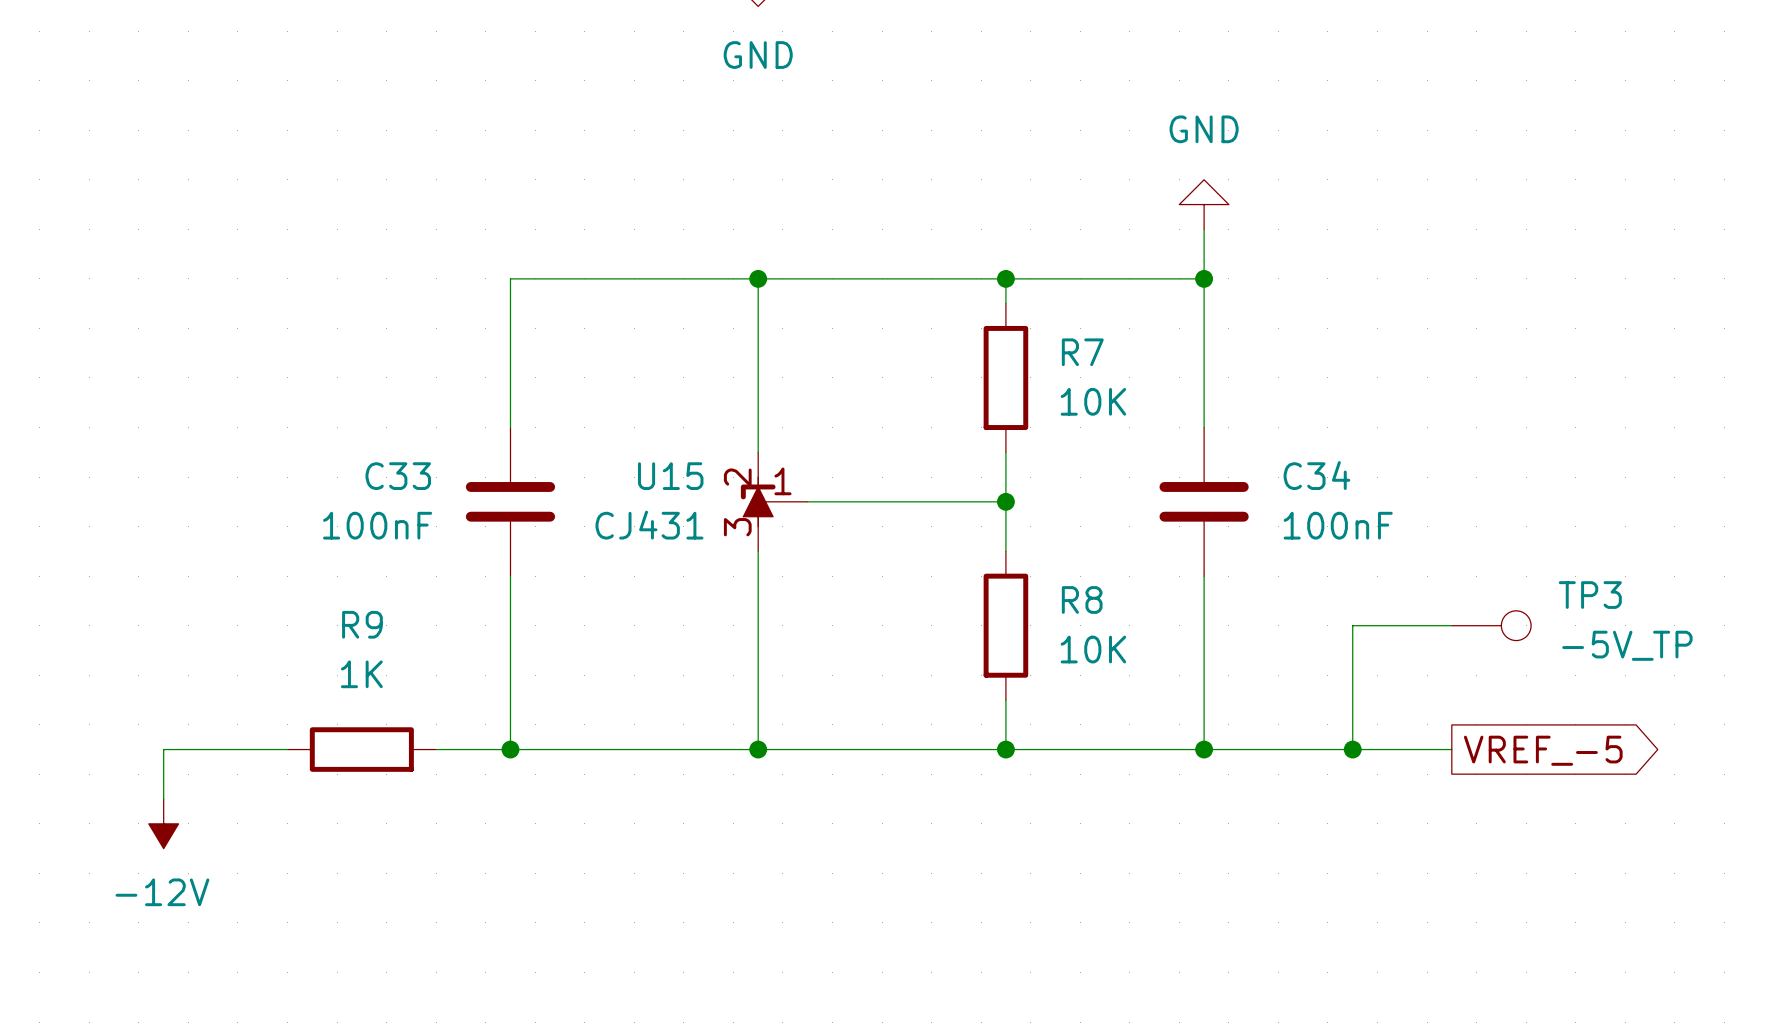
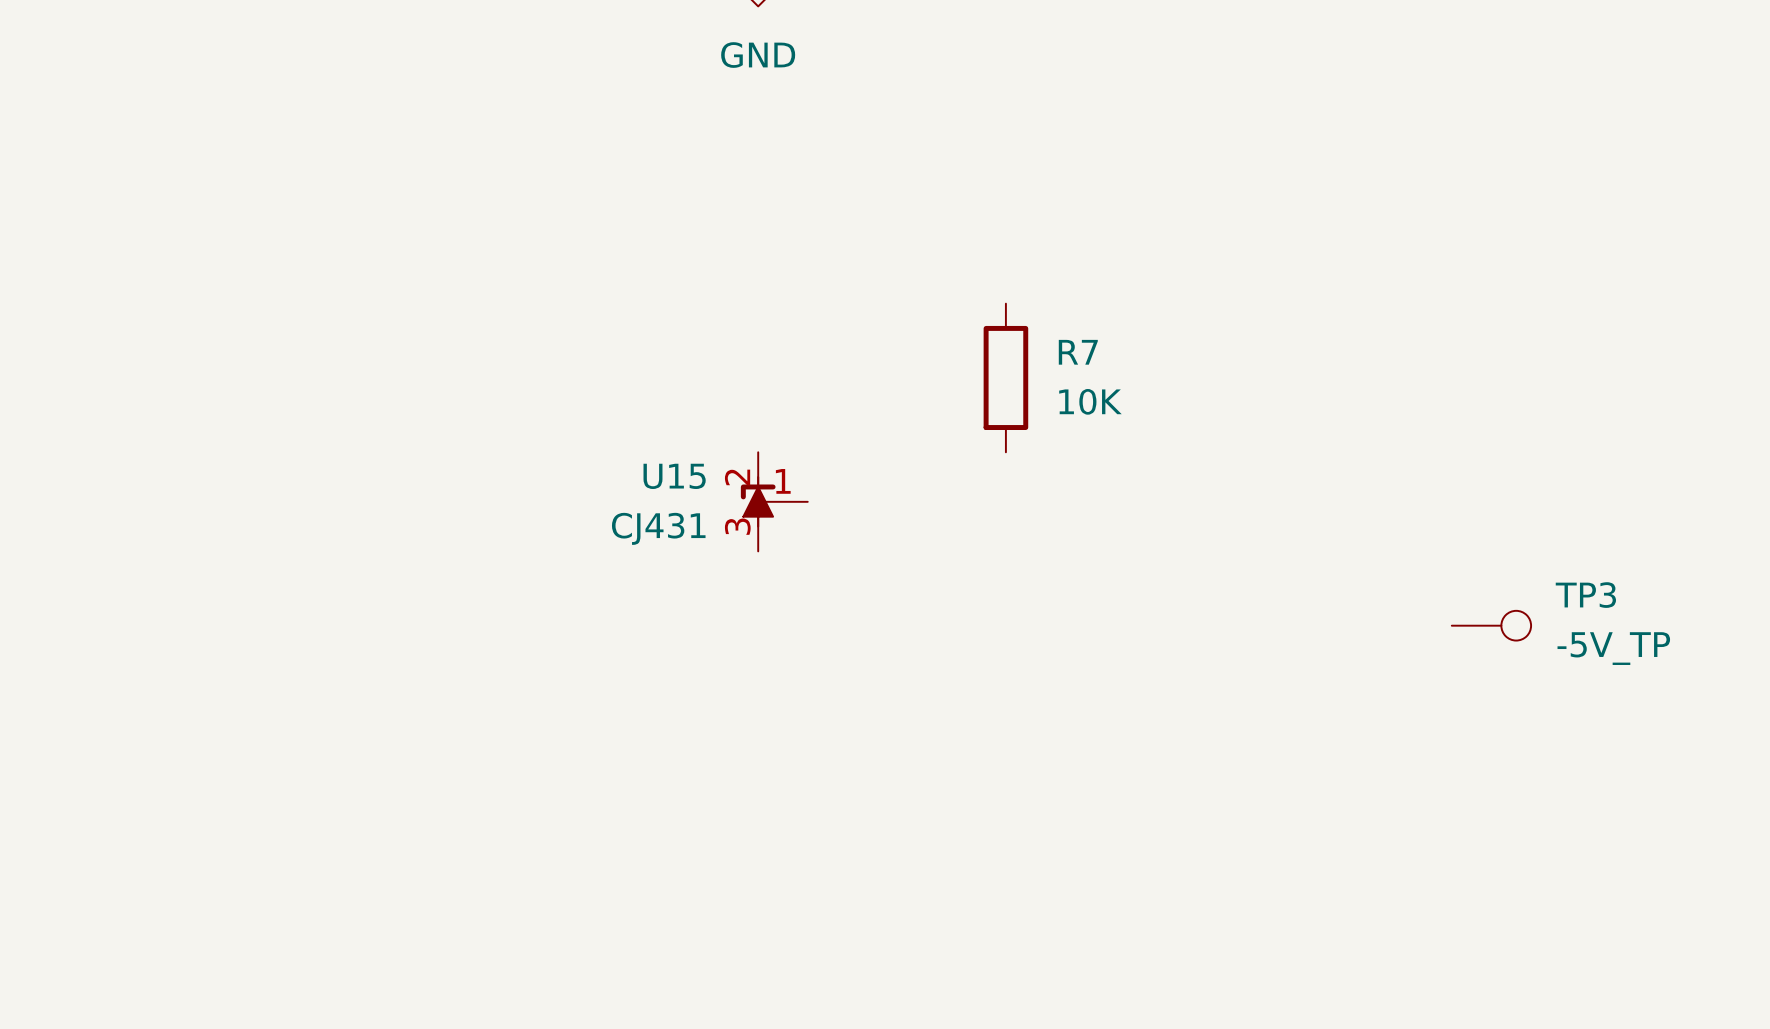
power symbol: GND (1204, 204) -> none
wire: (1204, 229) (1204, 427) -> none
wire: (758, 278) (758, 452) -> none
junction: (758, 278) -> none
wire: (1005, 278) (1005, 303) -> none
junction: (1005, 278) -> none
wire: (1204, 278) (510, 278) (510, 427) -> none
junction: (1204, 278) -> none
wire: (1005, 452) (1005, 551) -> none
C33: 100nF (510, 501) -> none
wire: (807, 501) (1005, 501) -> none
junction: (1005, 501) -> none
C34: 100nF (1204, 501) -> none
wire: (758, 551) (758, 749) -> none
wire: (510, 576) (510, 749) -> none
wire: (1204, 576) (1204, 749) -> none
R8: 10K (1005, 625) -> none
wire: (1451, 625) (1352, 625) (1352, 749) -> none
wire: (1005, 700) (1005, 749) -> none
wire: (287, 749) (163, 749) (163, 799) -> none
R9: 1K (361, 749) -> none
wire: (436, 749) (1451, 749) -> none
junction: (510, 749) -> none
junction: (758, 749) -> none
junction: (1005, 749) -> none
junction: (1204, 749) -> none
junction: (1352, 749) -> none
global label: VREF_-5 (1543, 750) -> none
power symbol: -12V (163, 823) -> none

